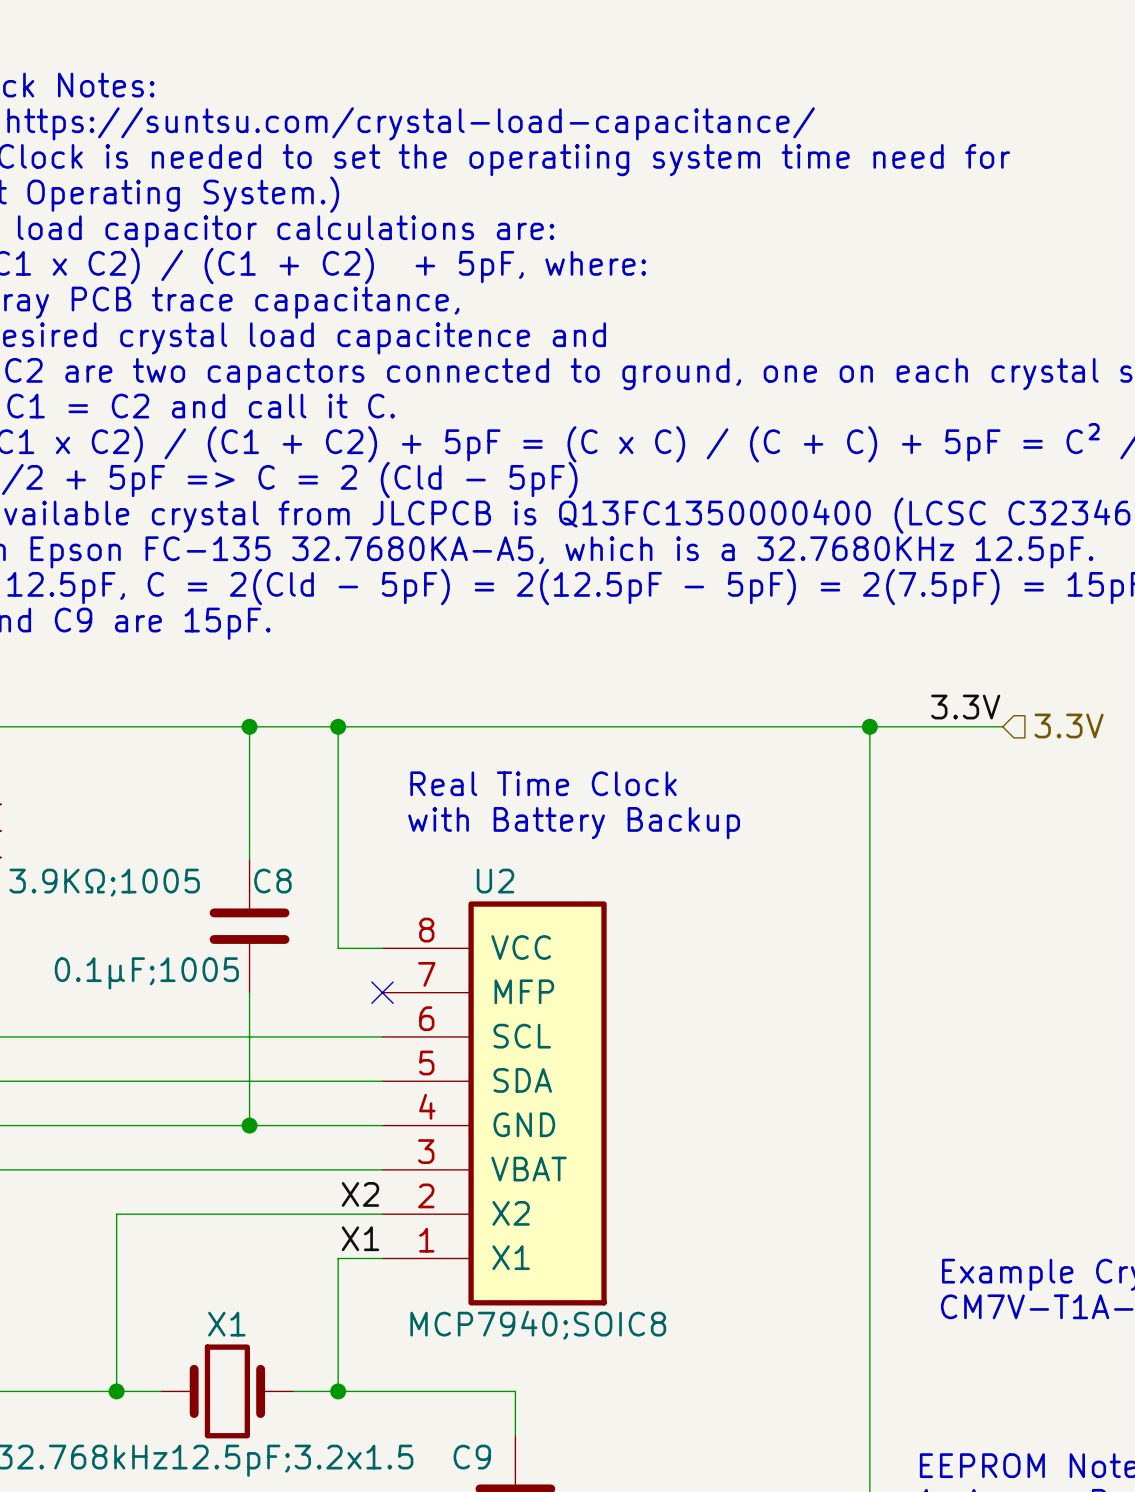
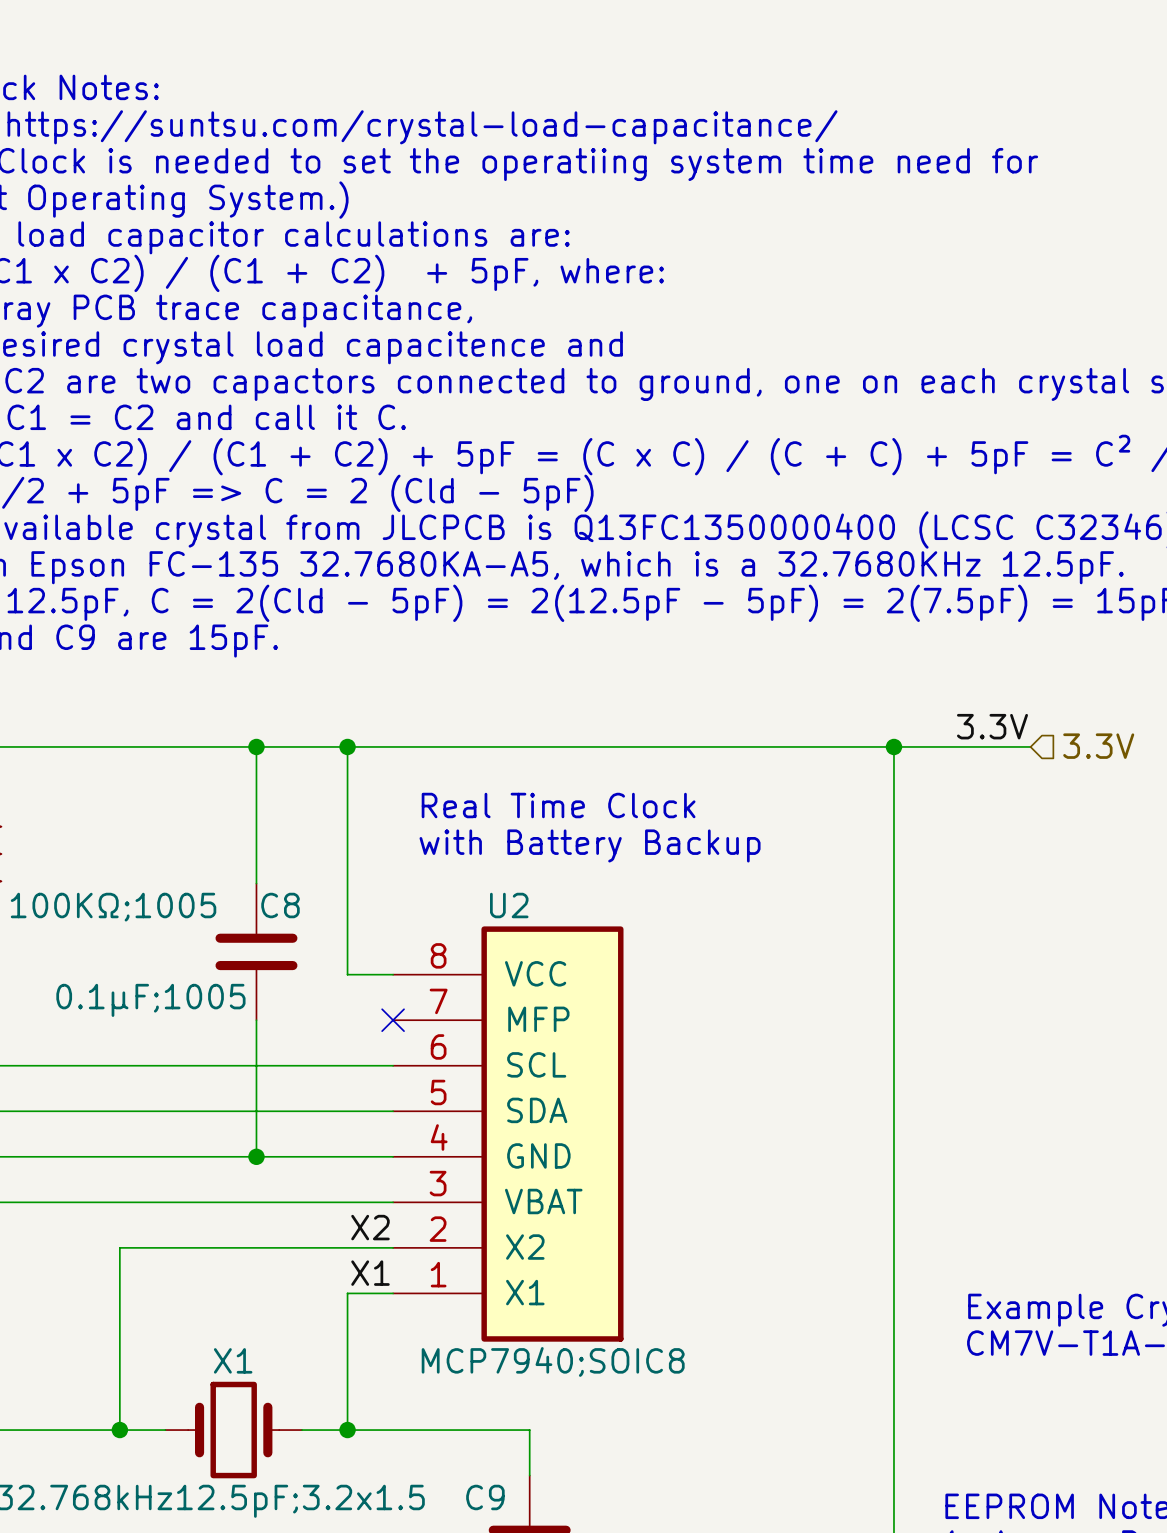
part value: 3.9KΩ;1005 (104, 882) -> 100KΩ;1005 (113, 907)

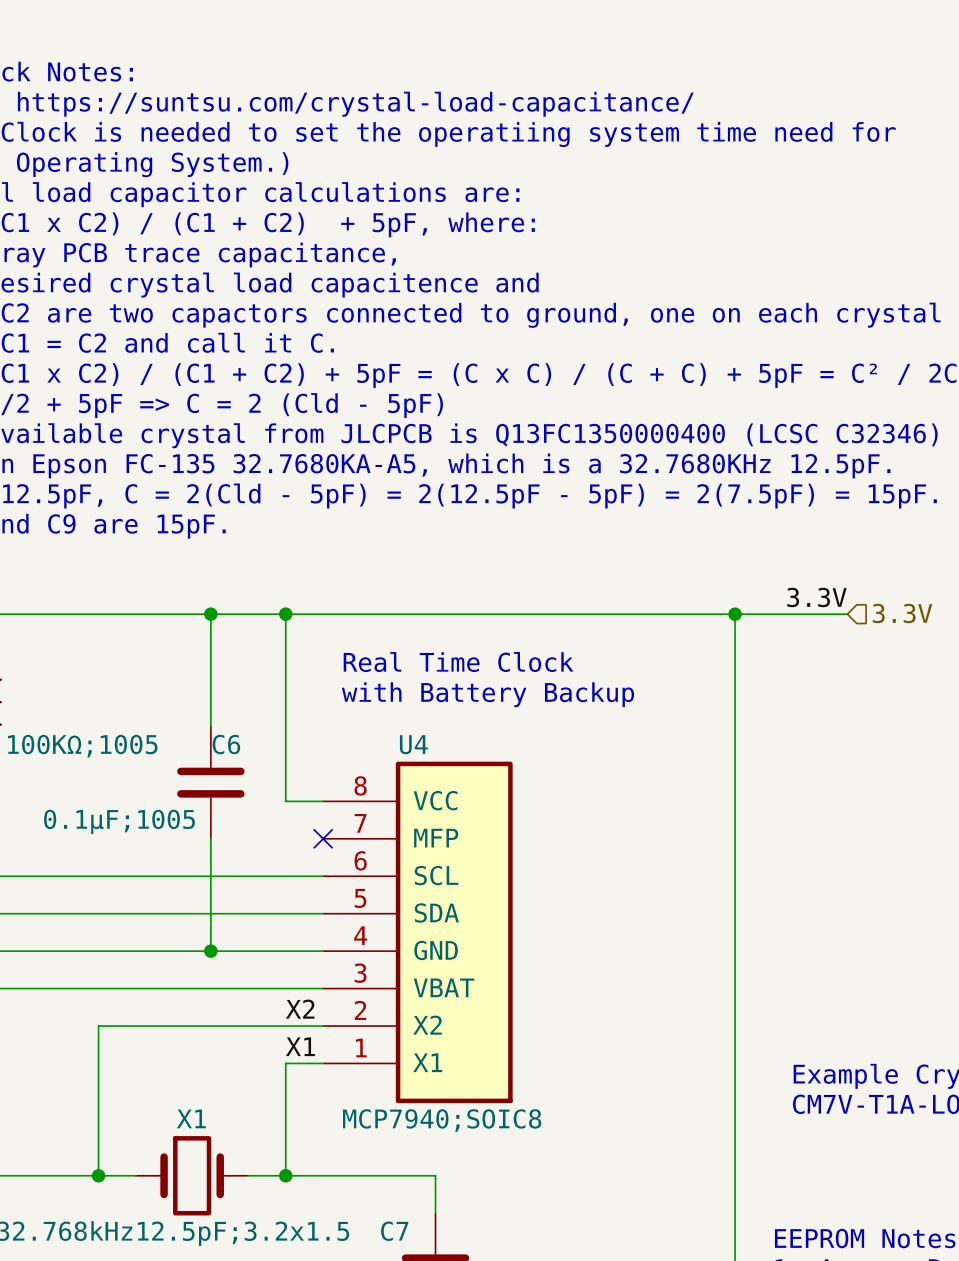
C8 name: C8 (280, 905) -> C6 (226, 744)
U2 name: U2 (509, 905) -> U4 (413, 744)
C9 name: C9 (485, 1497) -> C7 (394, 1231)

